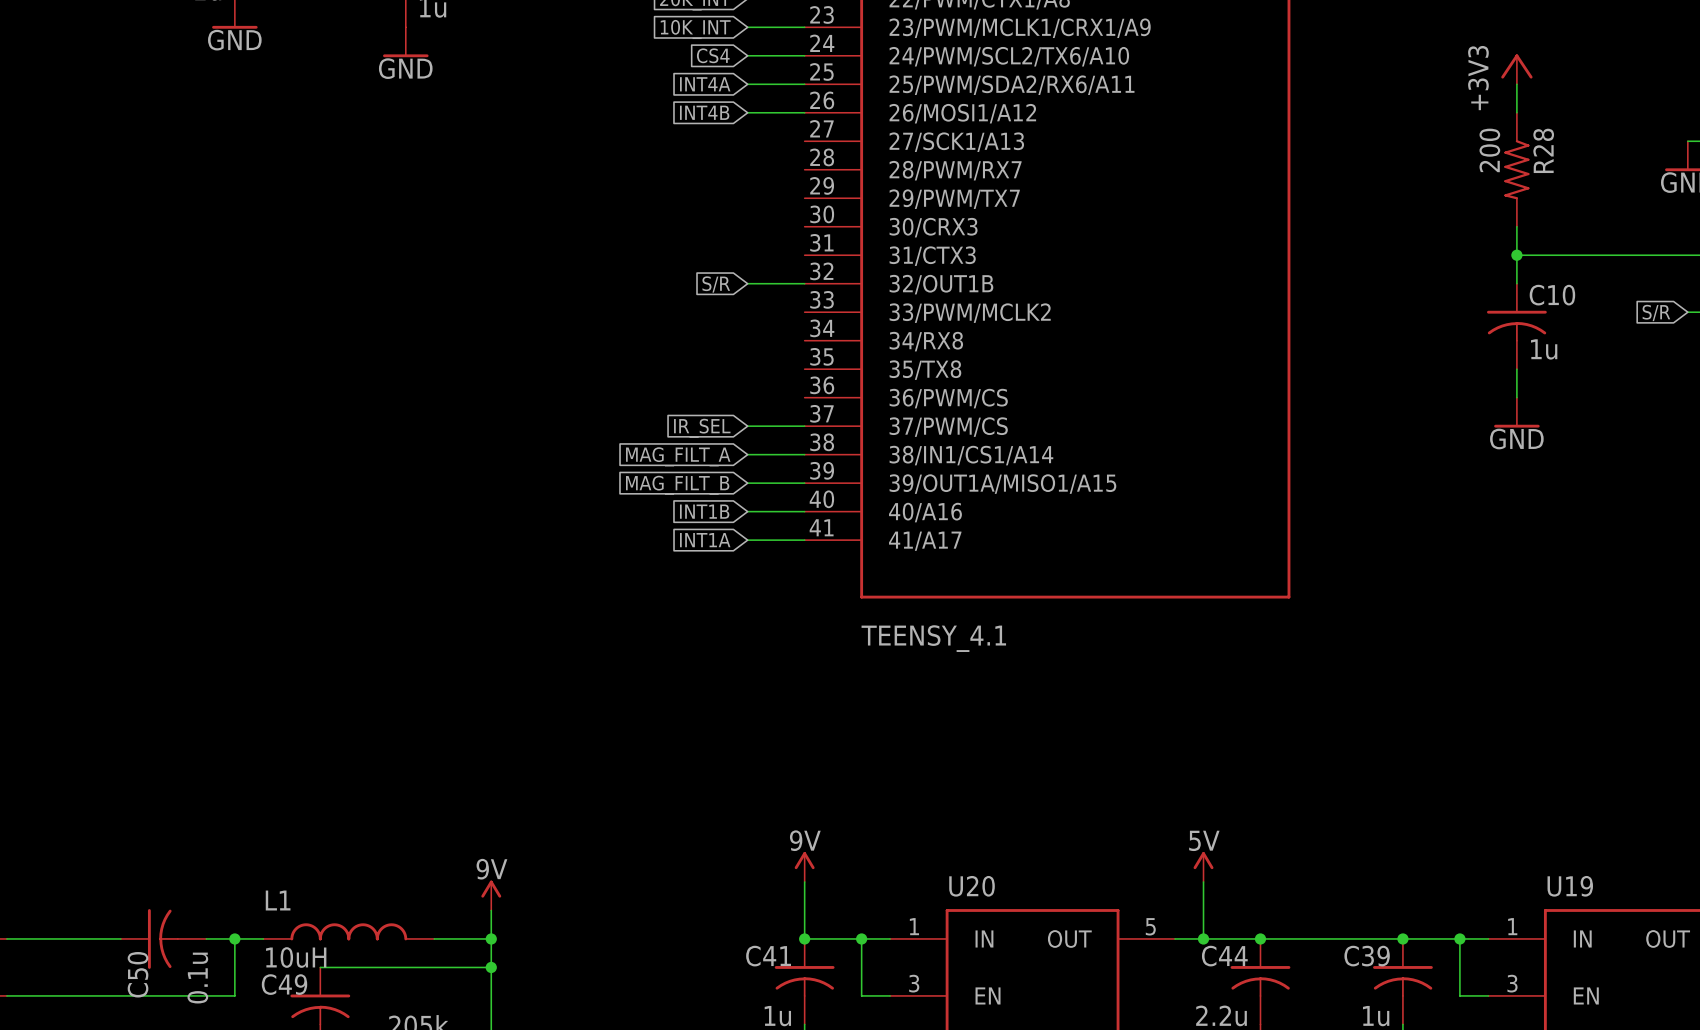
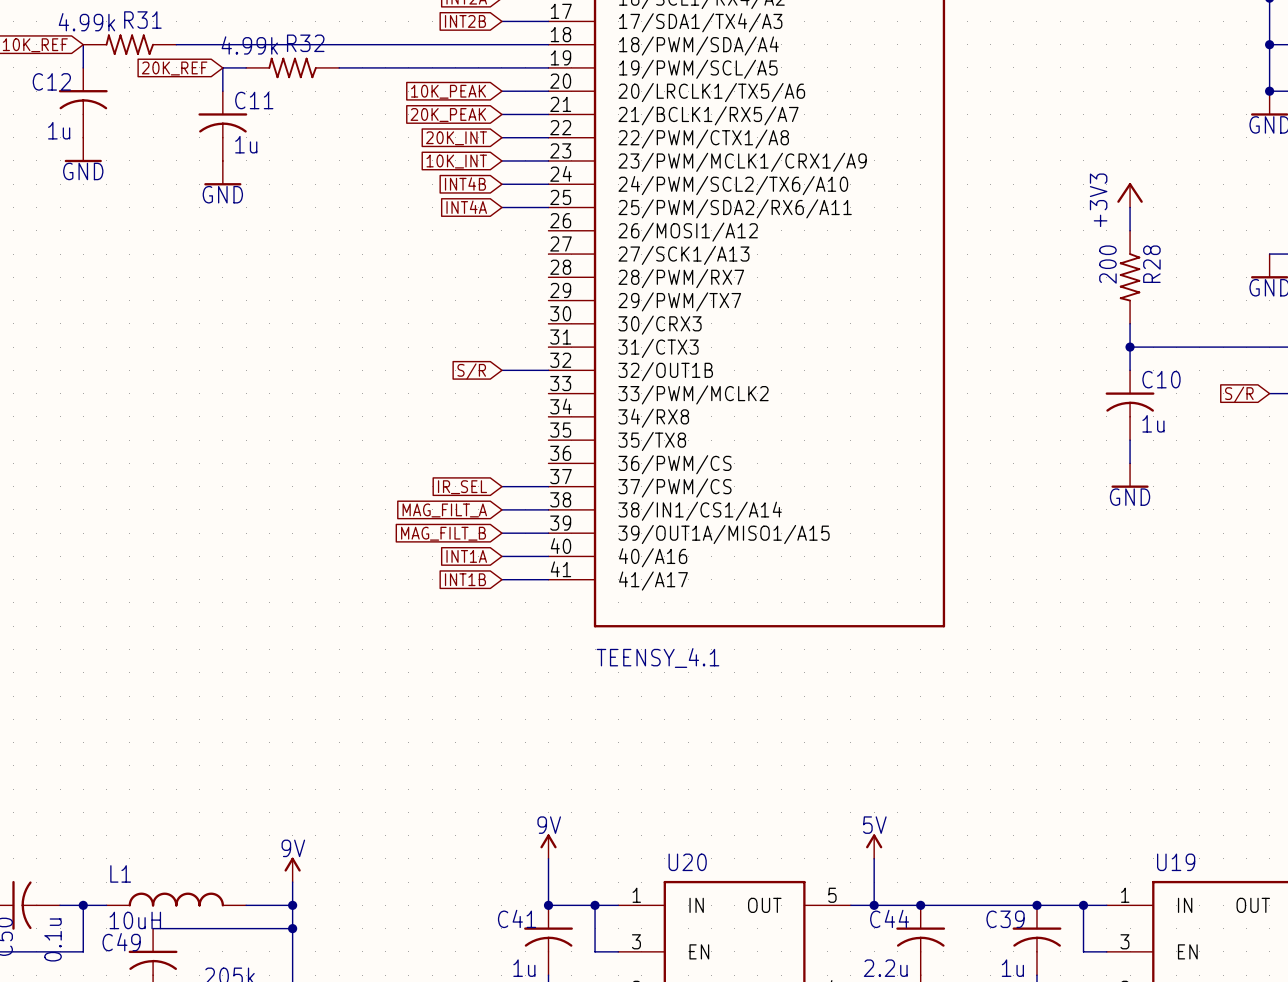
global label: CS4 (713, 55) -> INT4B (465, 183)
global label: INT4B (704, 112) -> none
wire: (747, 112) (804, 112) -> none
global label: INT1B (704, 511) -> INT1A (466, 556)
global label: INT1A (705, 540) -> INT1B (465, 579)

